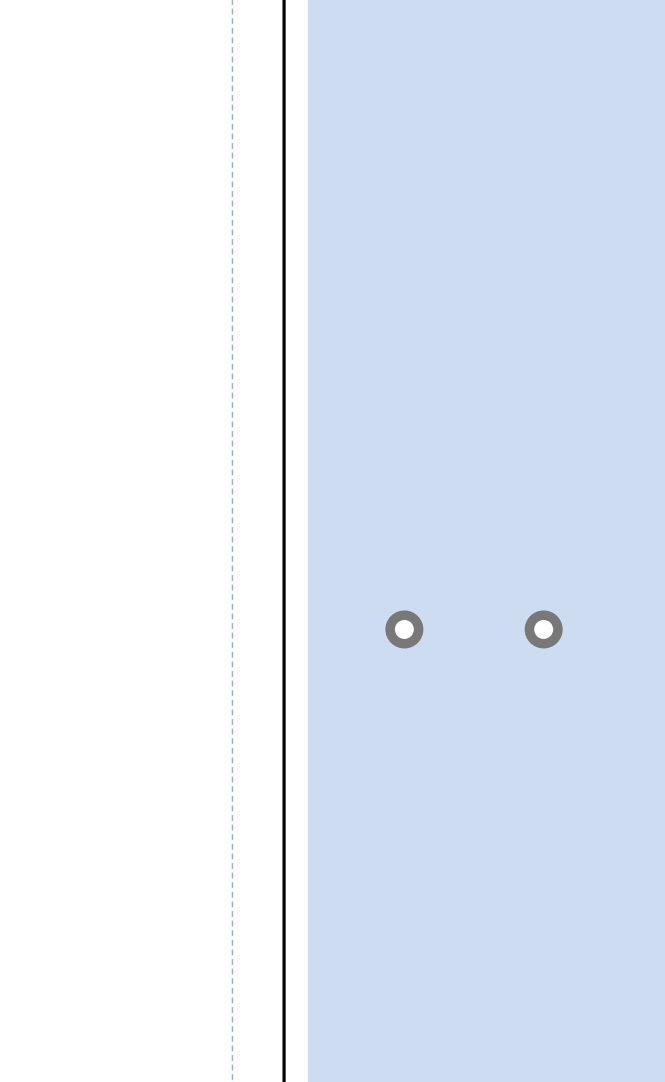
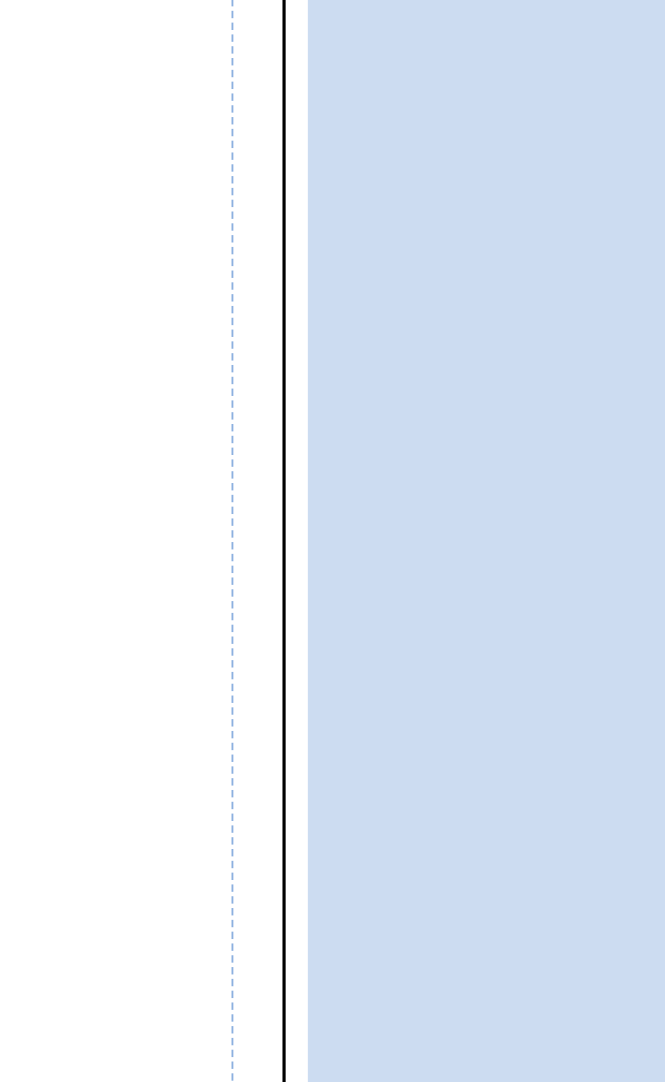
via: (404, 629) -> none
via: (543, 629) -> none

